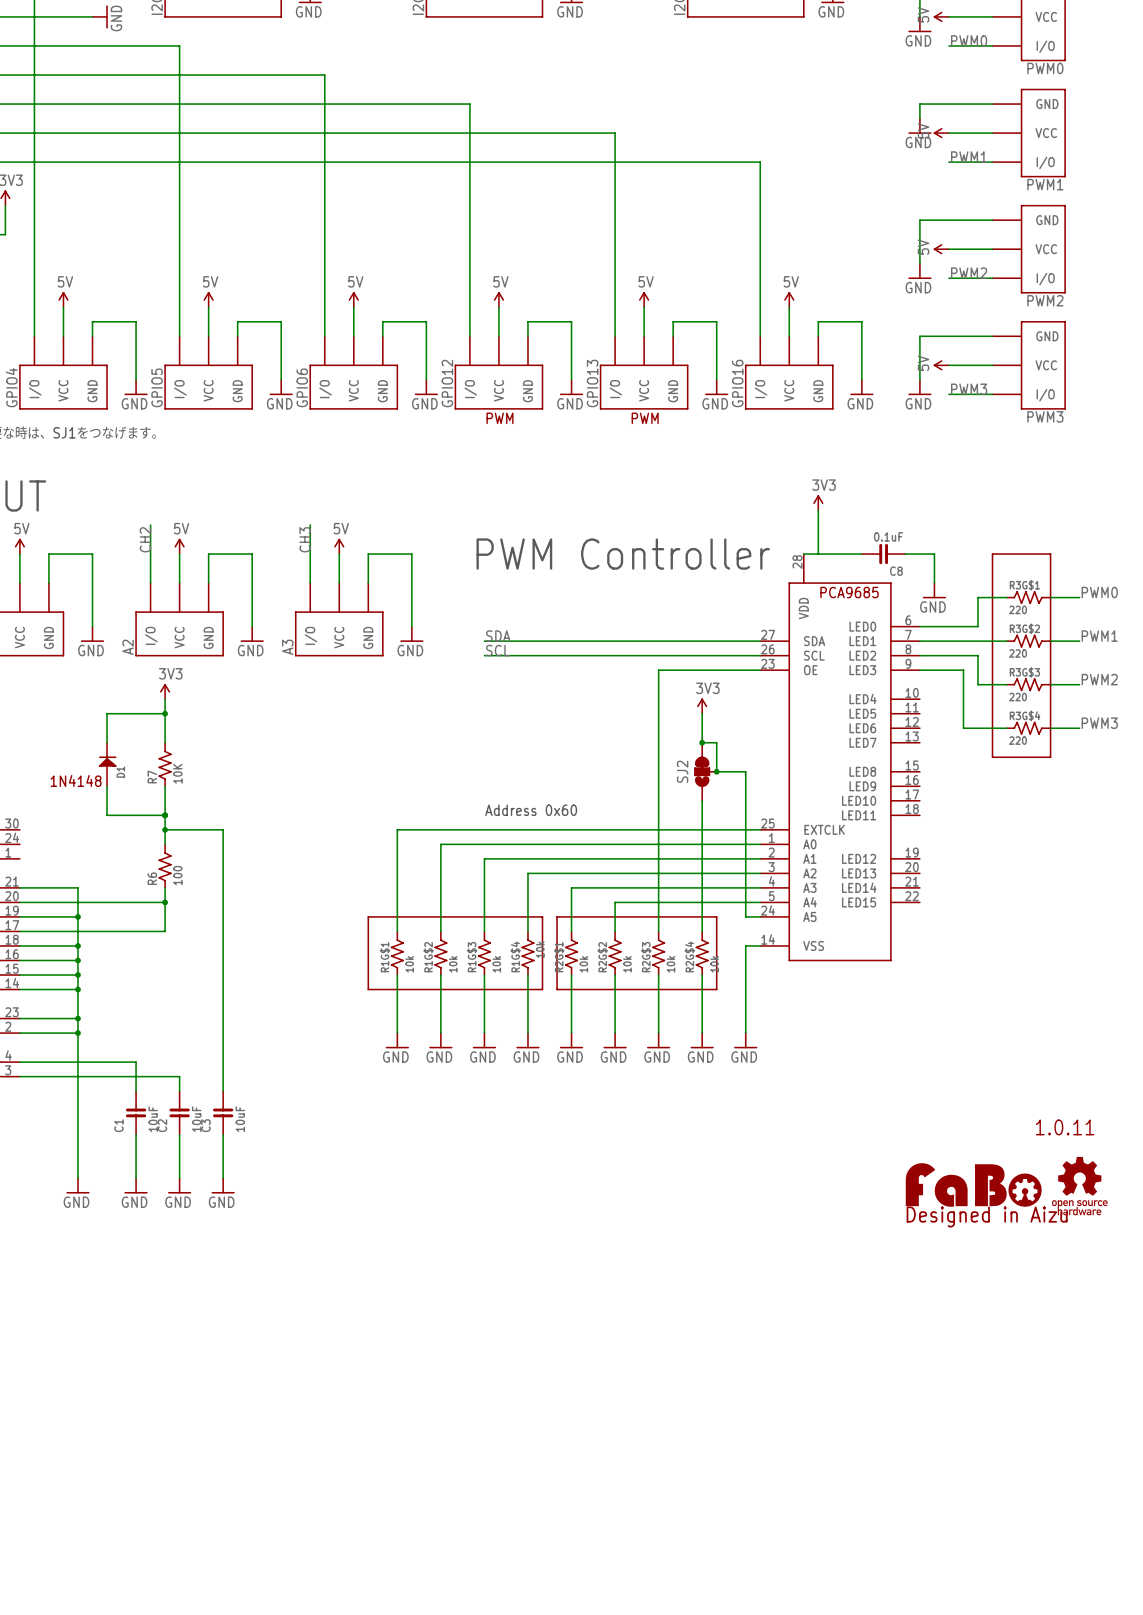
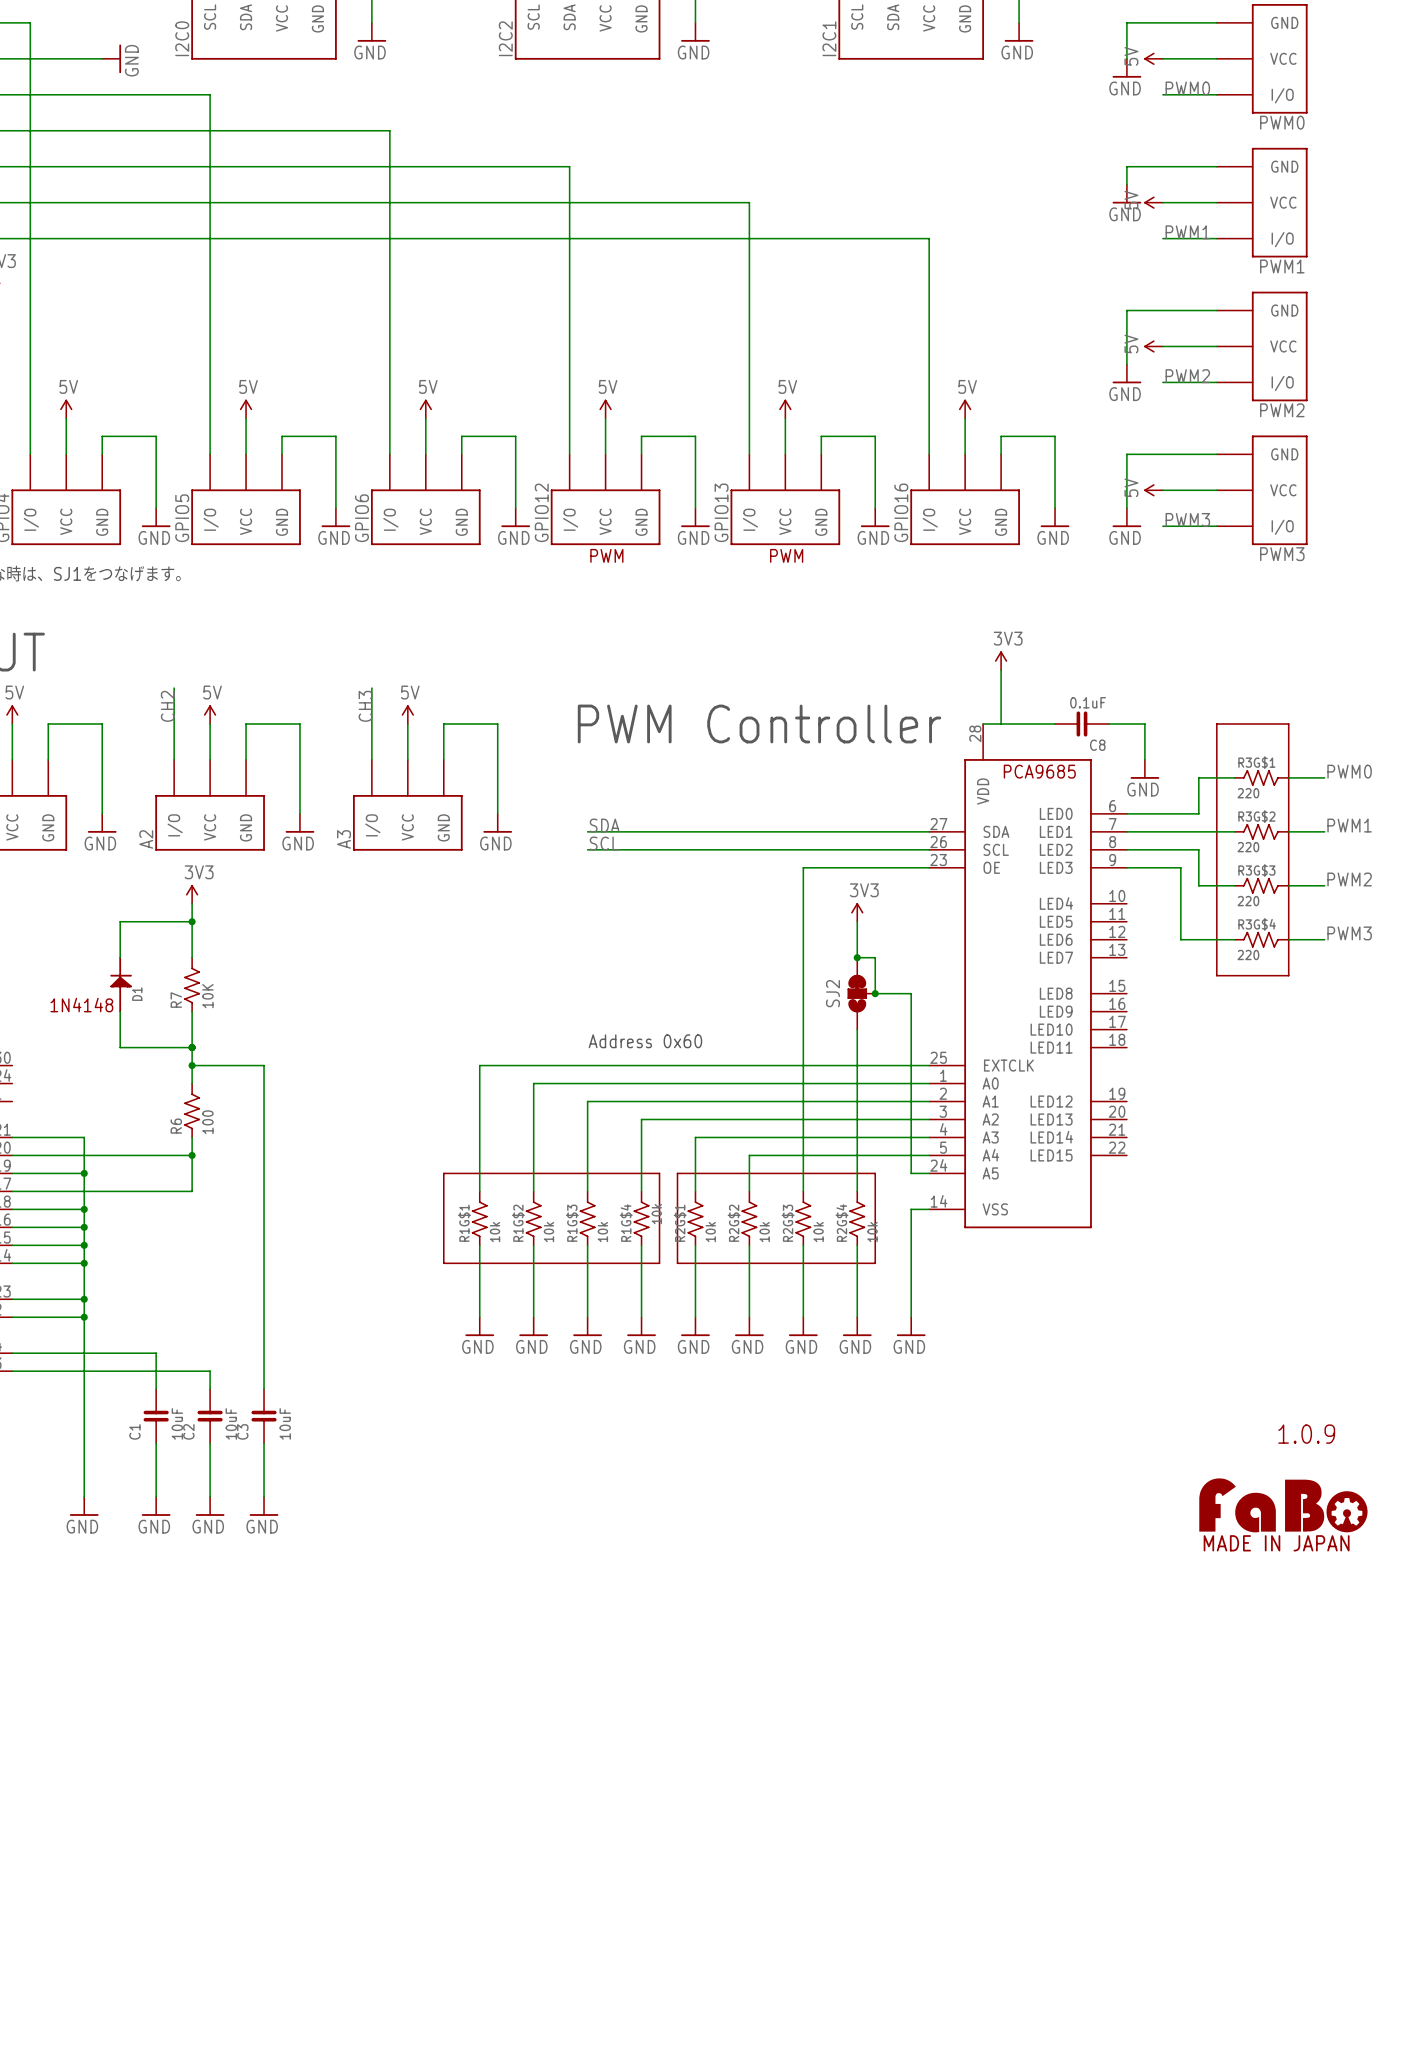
text: 1.0.11 (1065, 1127) -> 1.0.9 (1306, 1434)
part: (973, 1184) -> none
part: none -> (1283, 1505)
part: (1079, 1186) -> none

